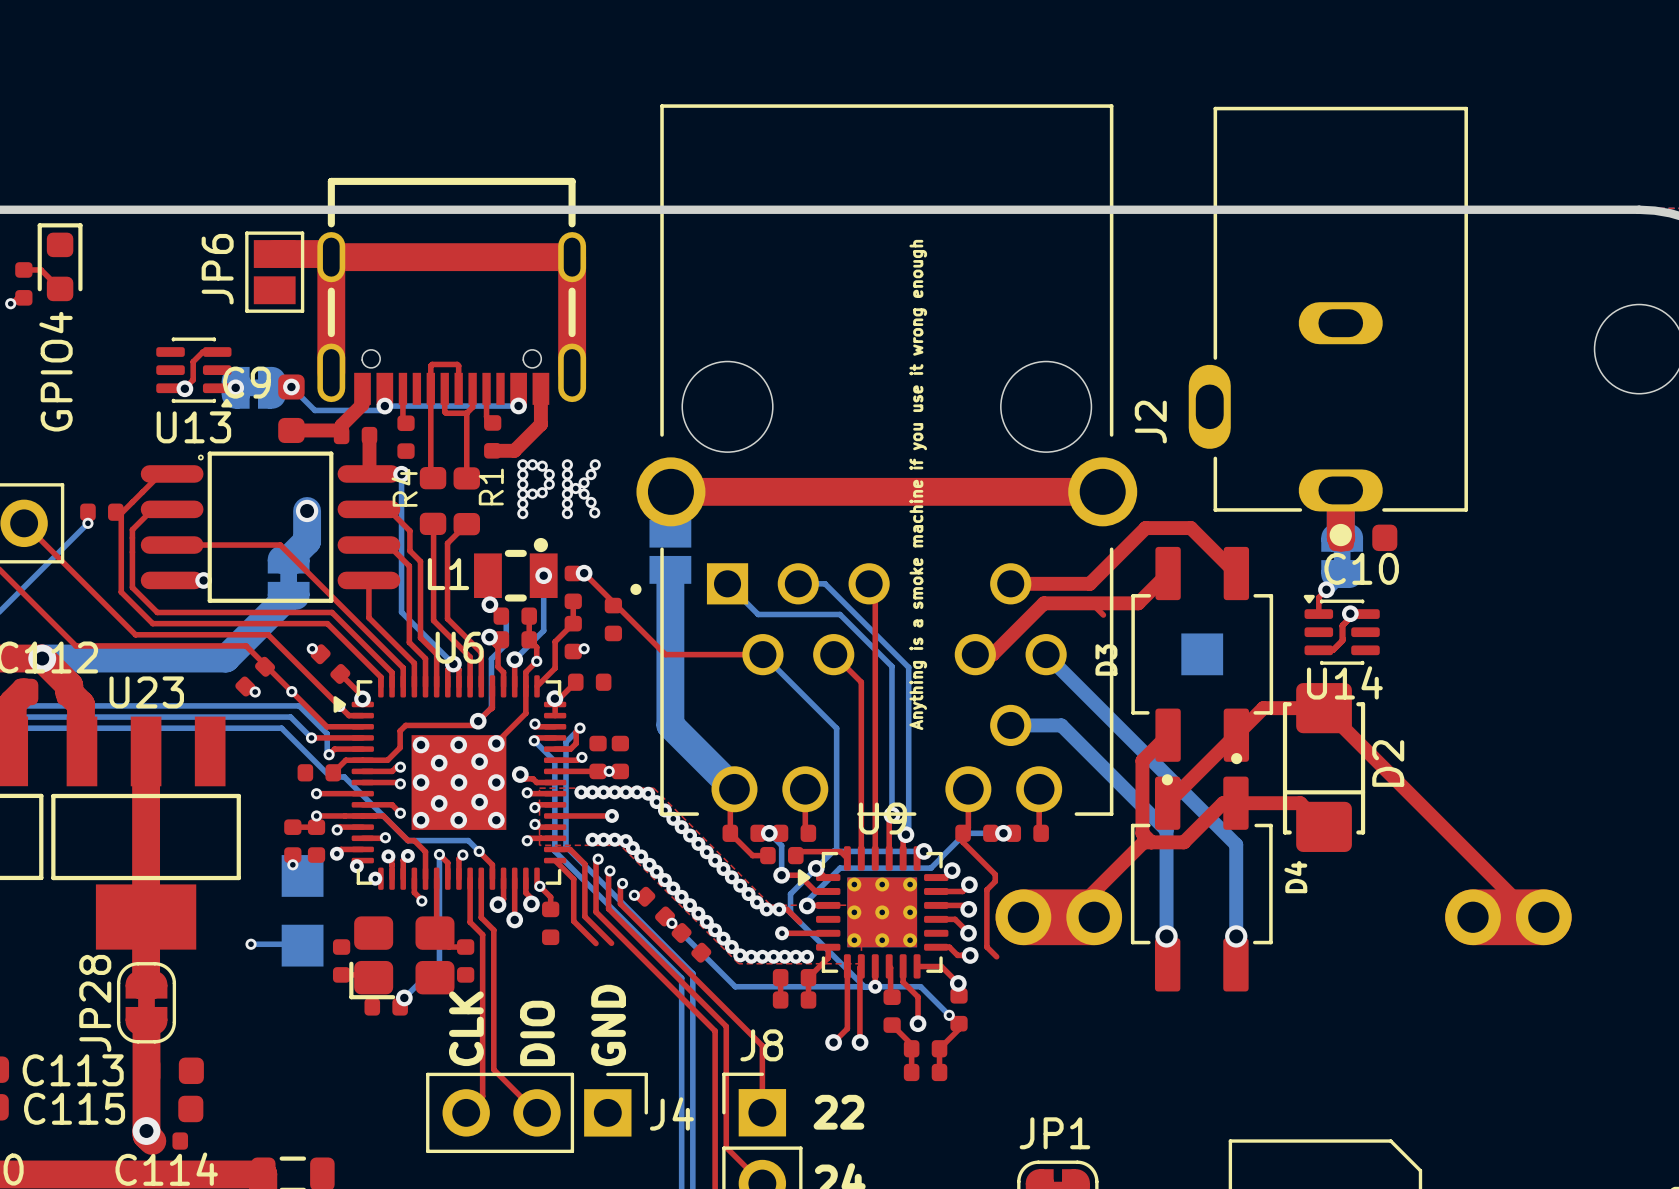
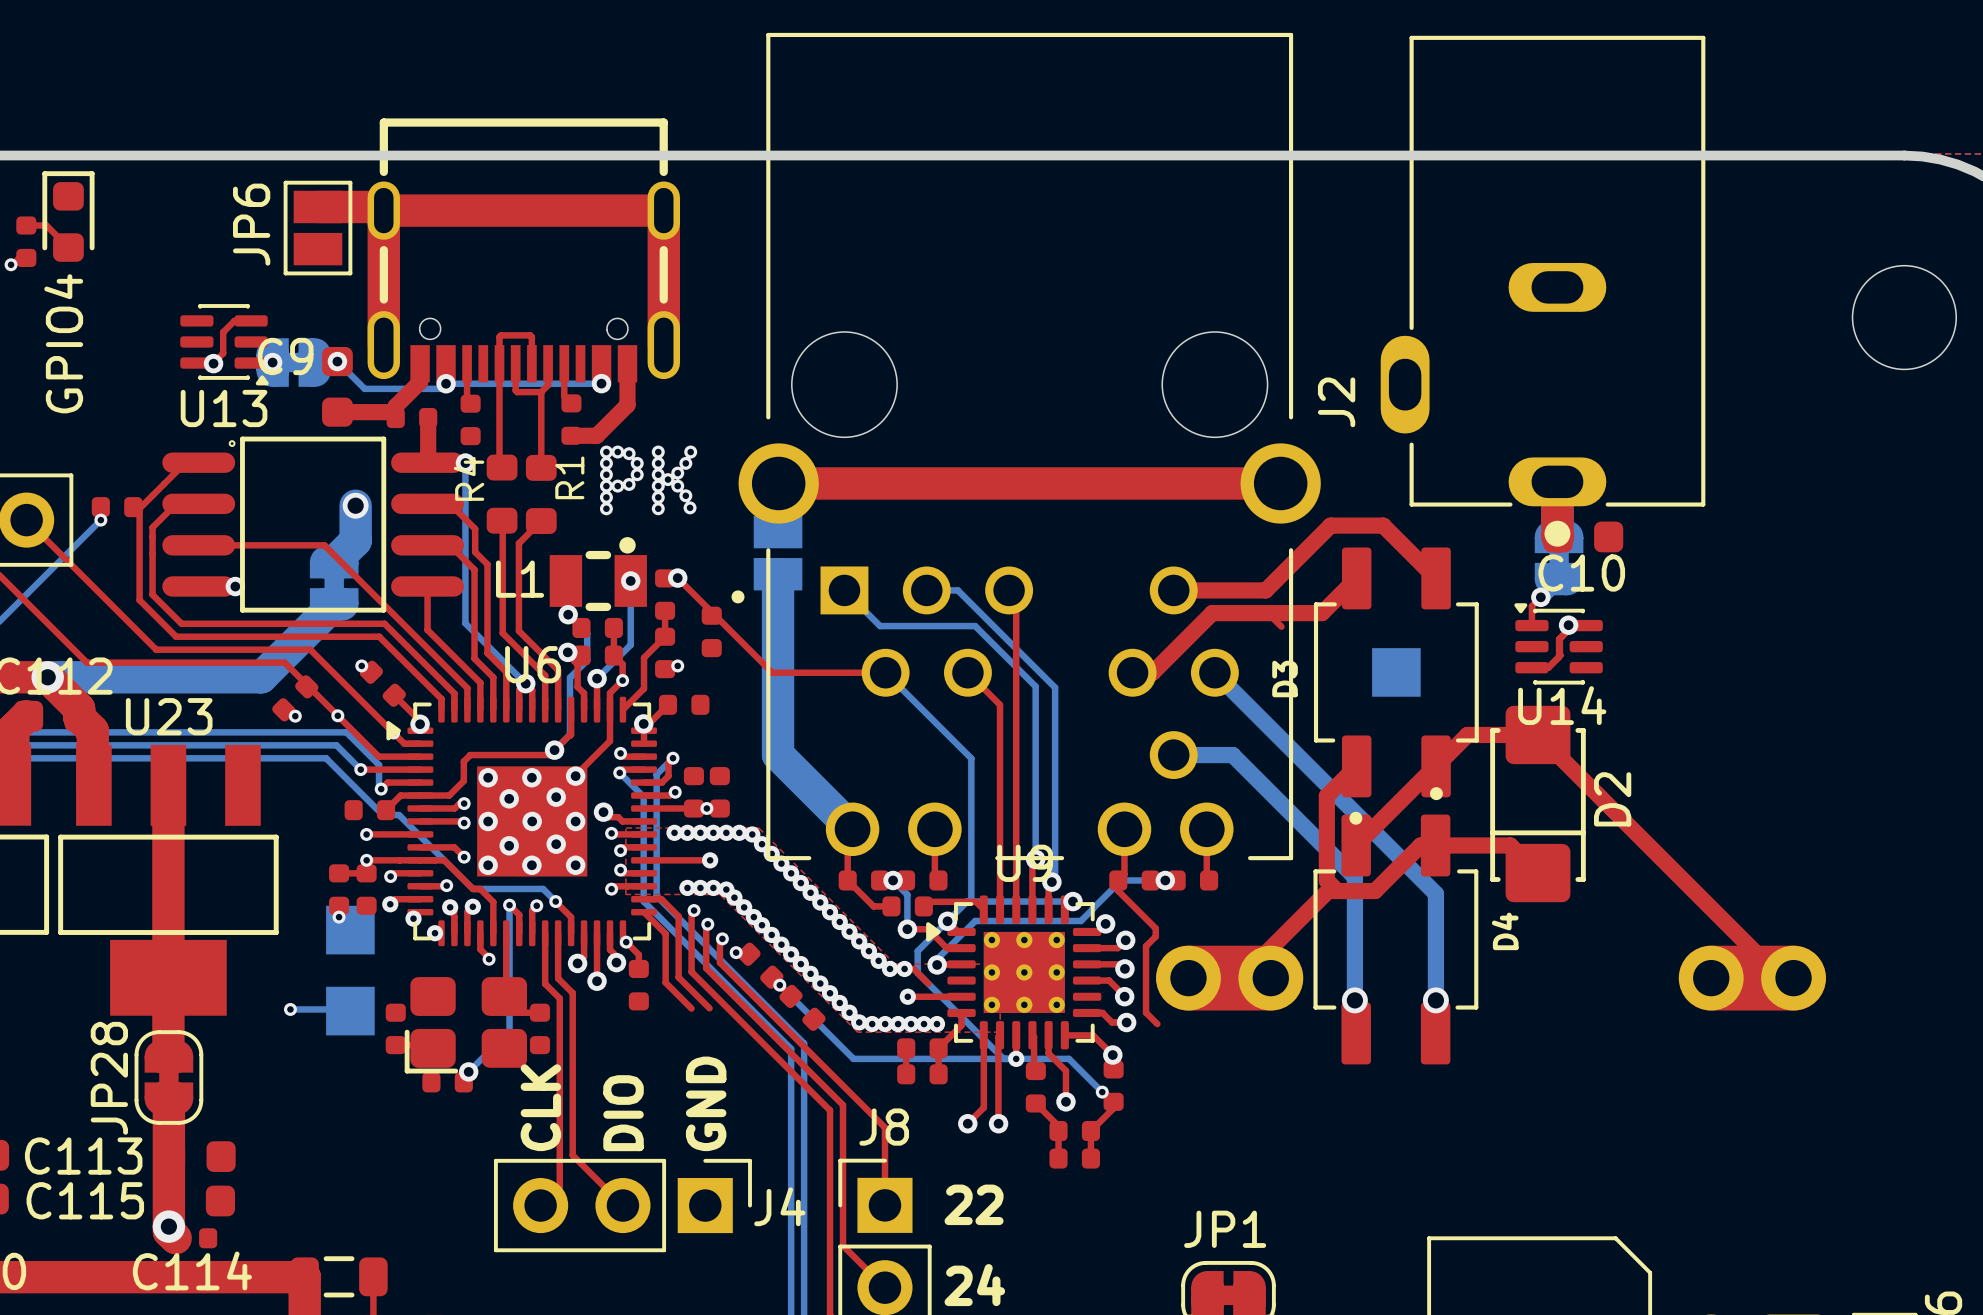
text: Anything is a smoke machine if you use it wrong enough (918, 484) -> none

